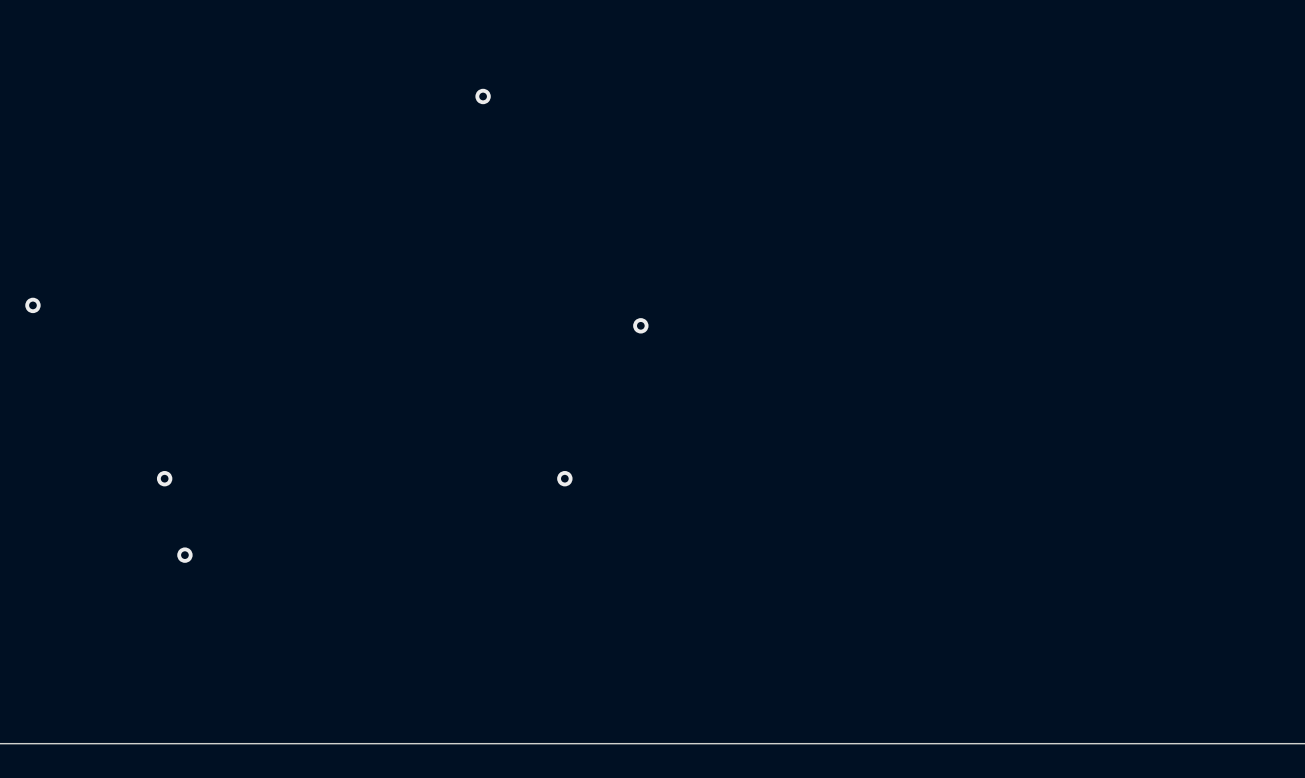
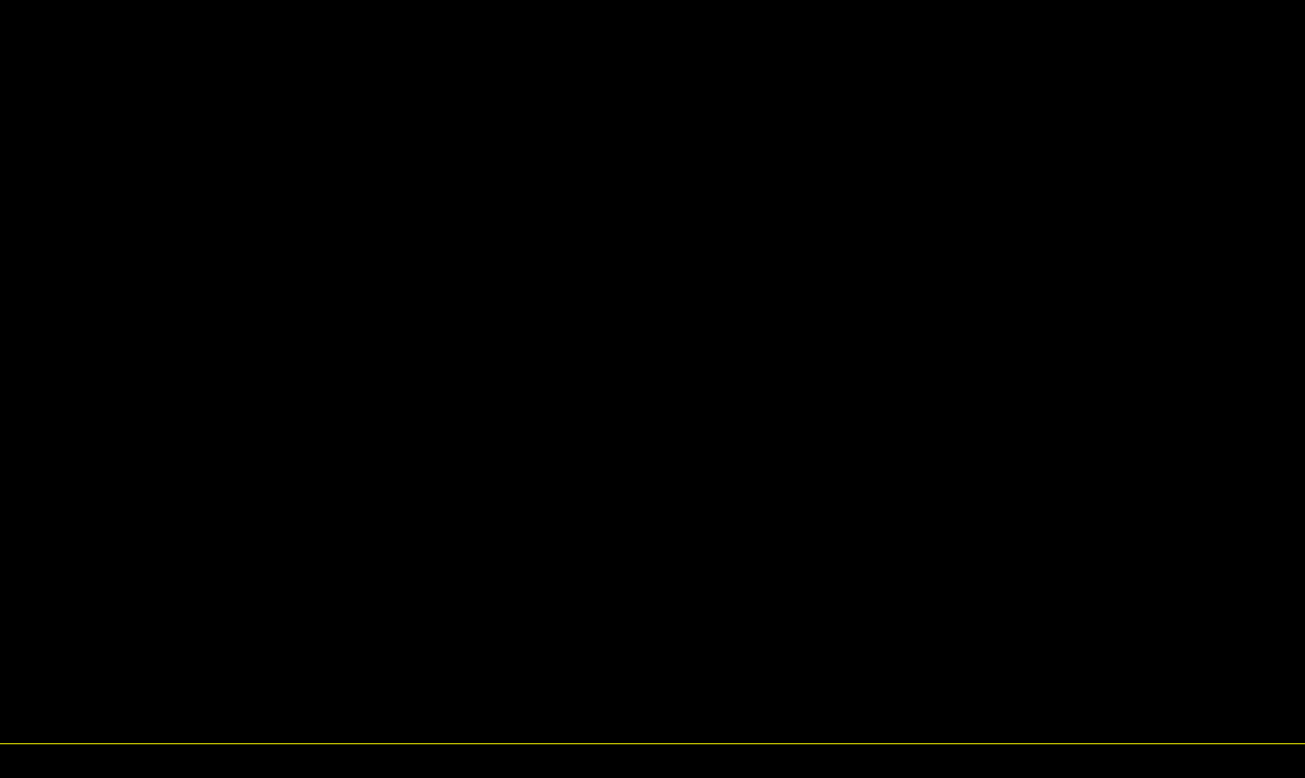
via: (483, 96) -> none
via: (32, 305) -> none
via: (640, 325) -> none
via: (164, 478) -> none
via: (564, 478) -> none
via: (184, 555) -> none

